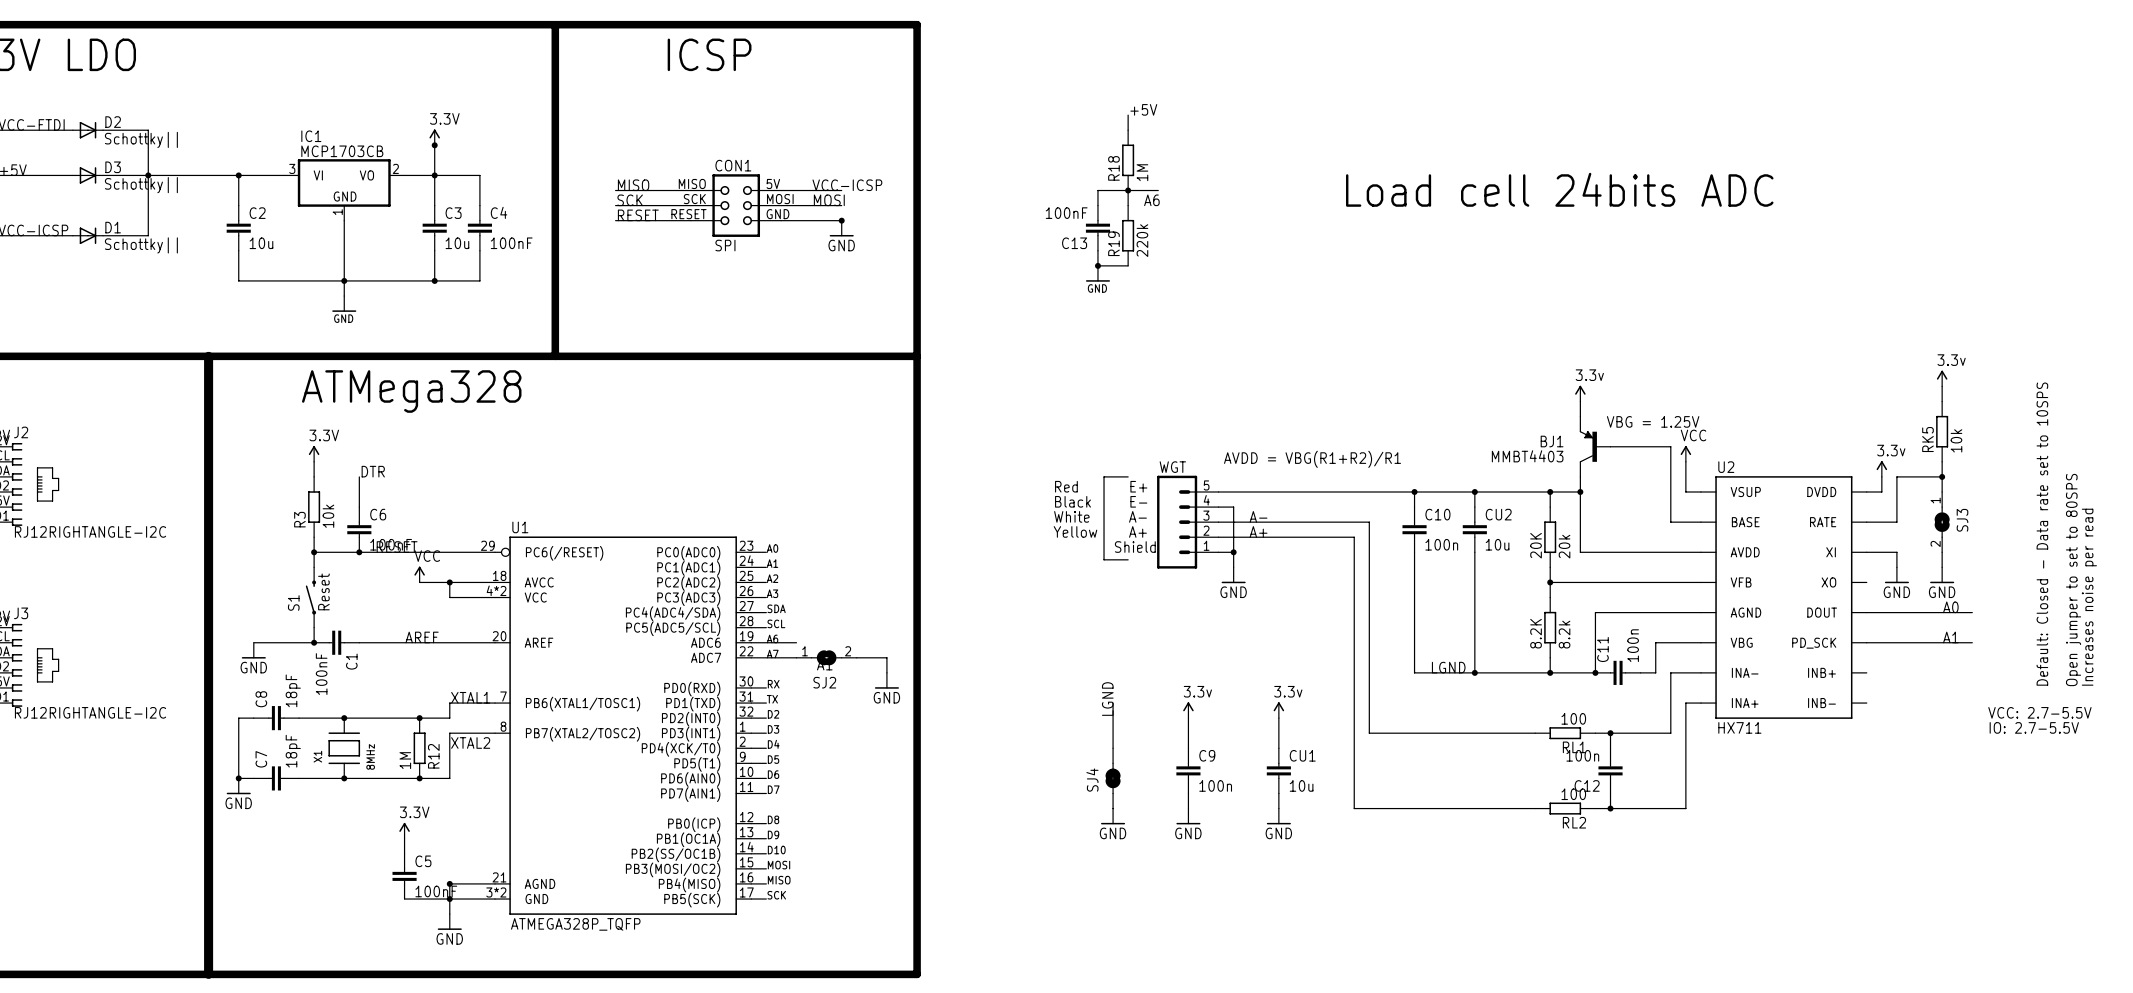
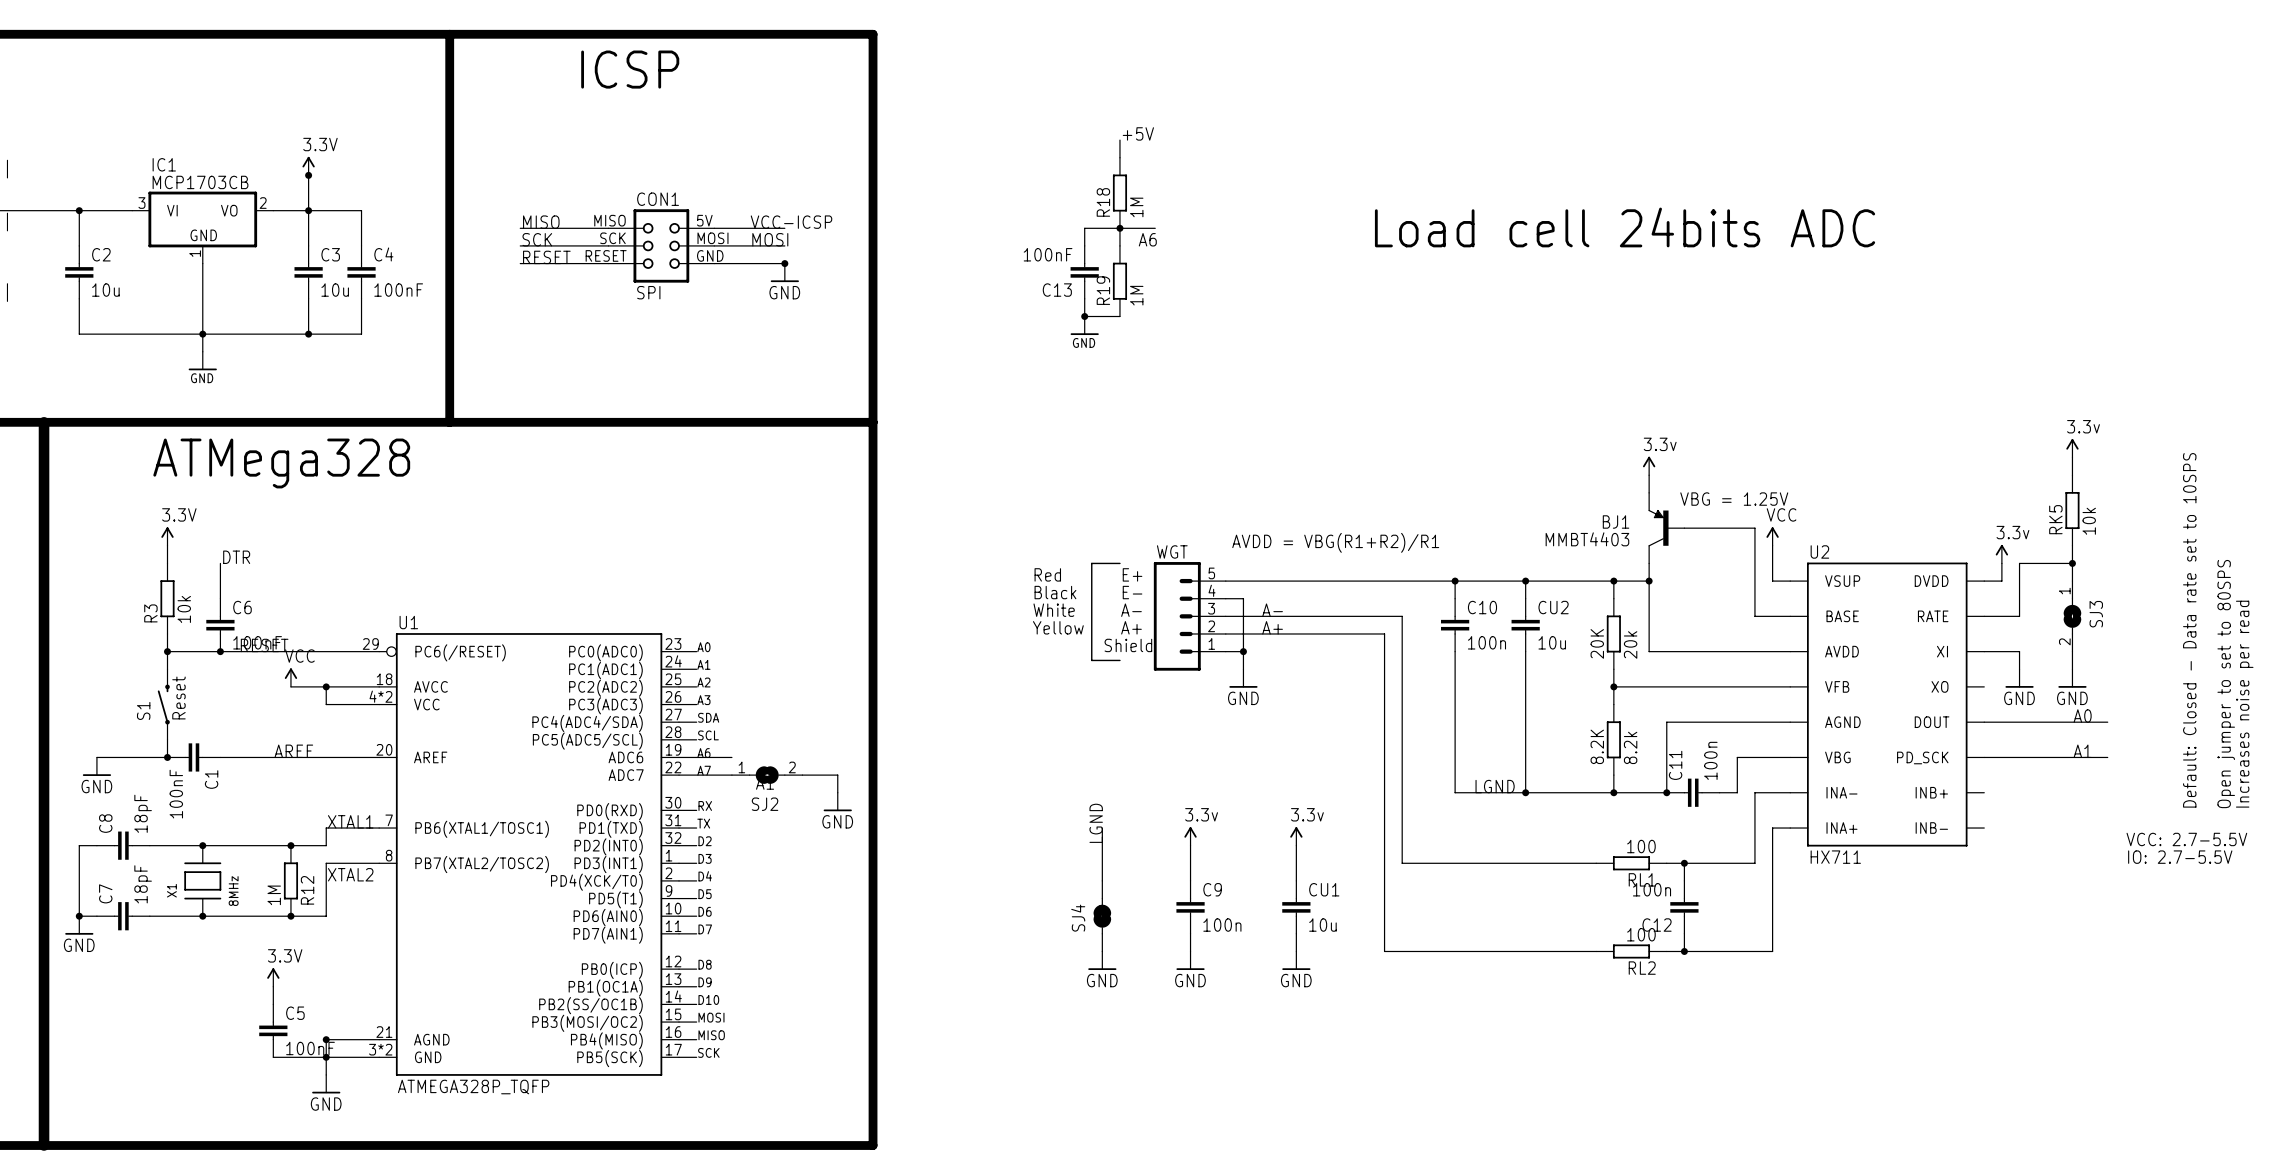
R19 value: 220k (1142, 240) -> 1M (1136, 295)

